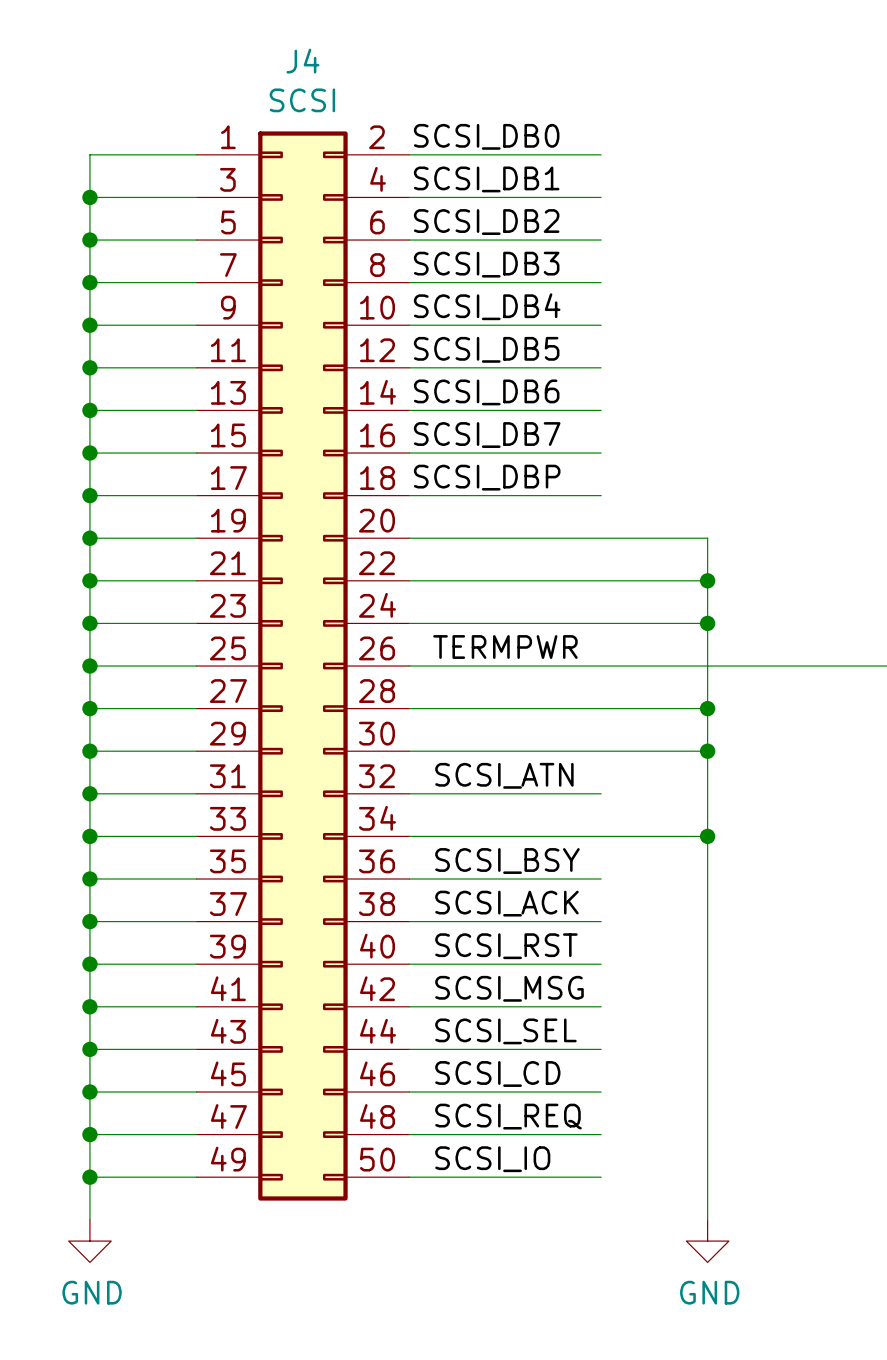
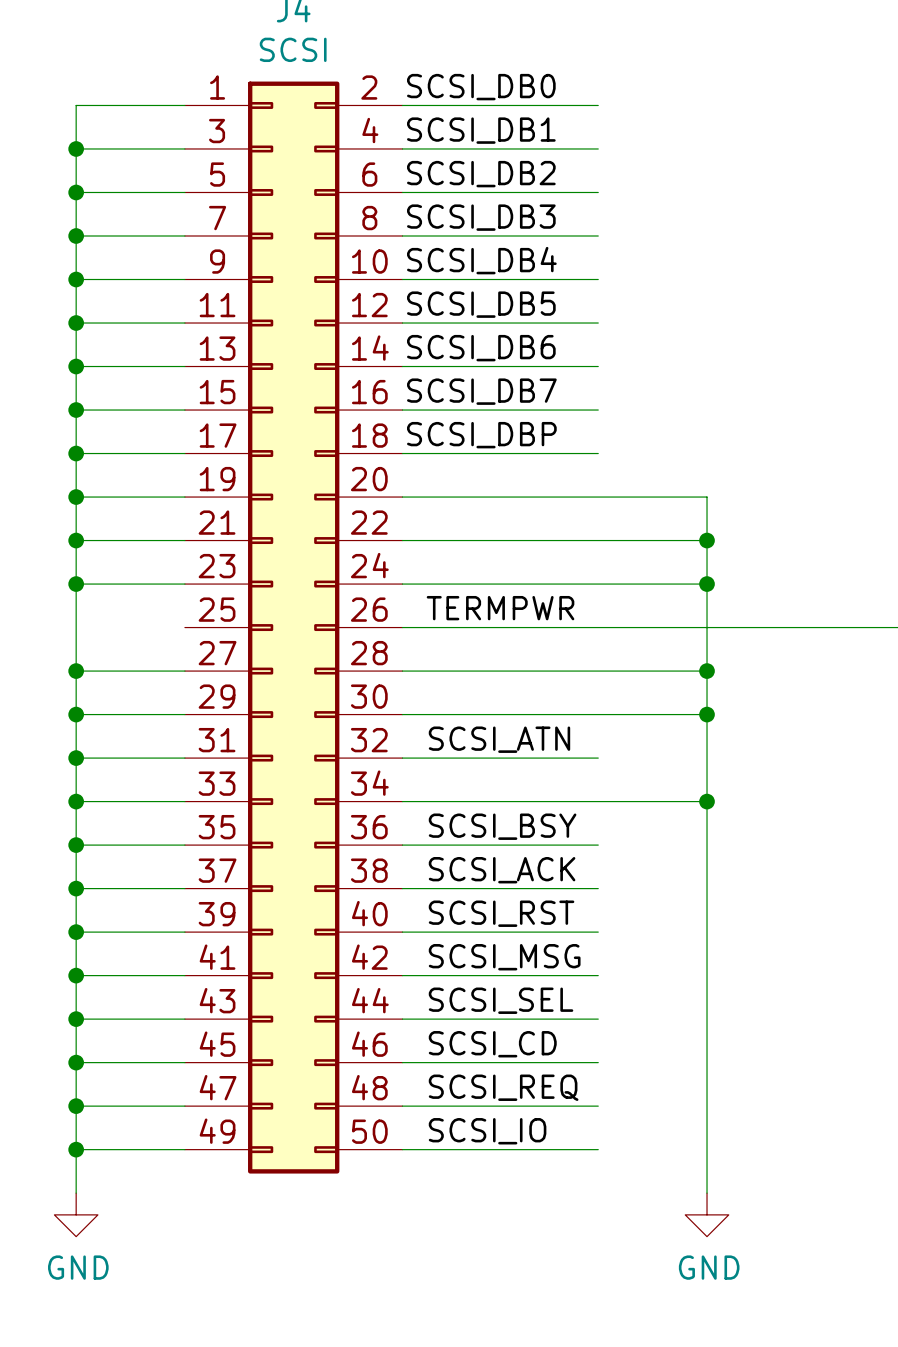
wire: (89, 666) (196, 666) -> none
junction: (89, 666) -> none

